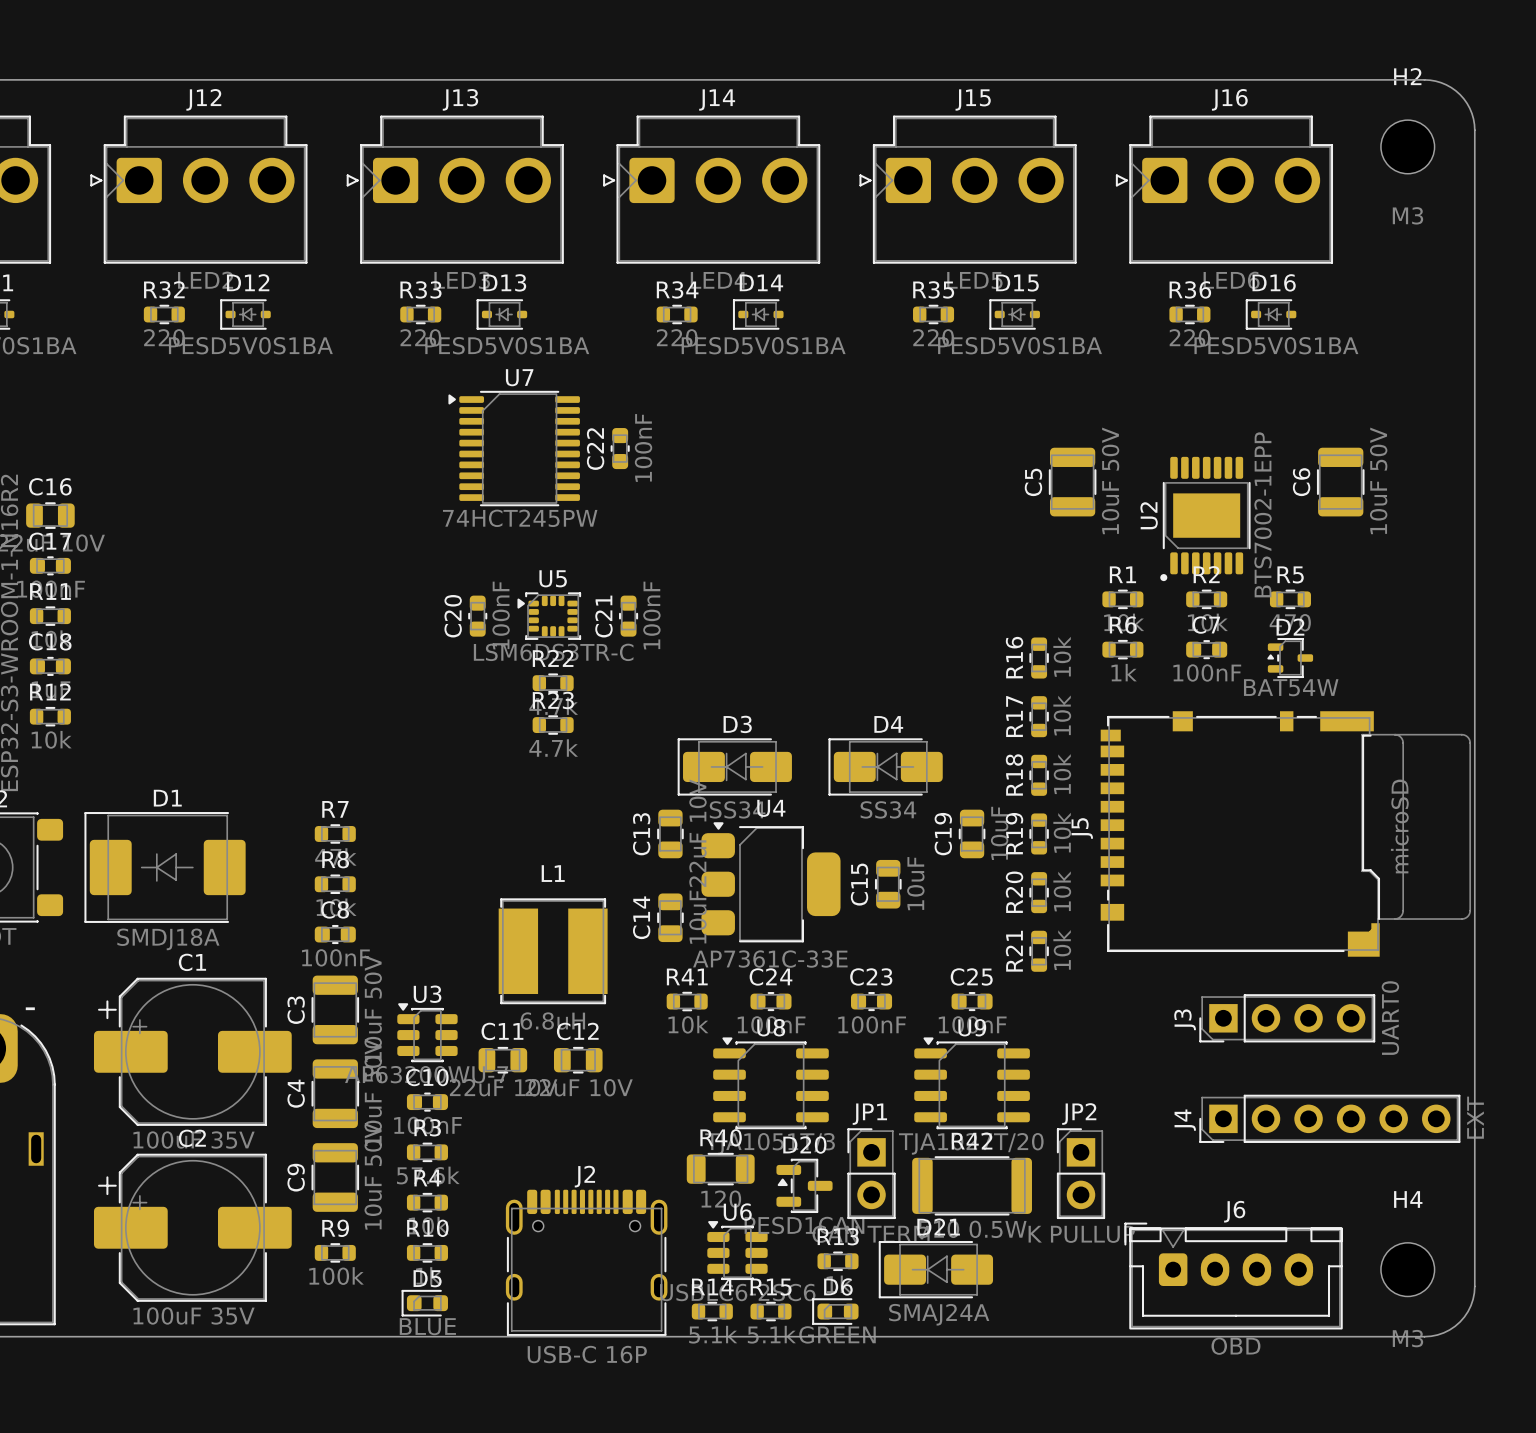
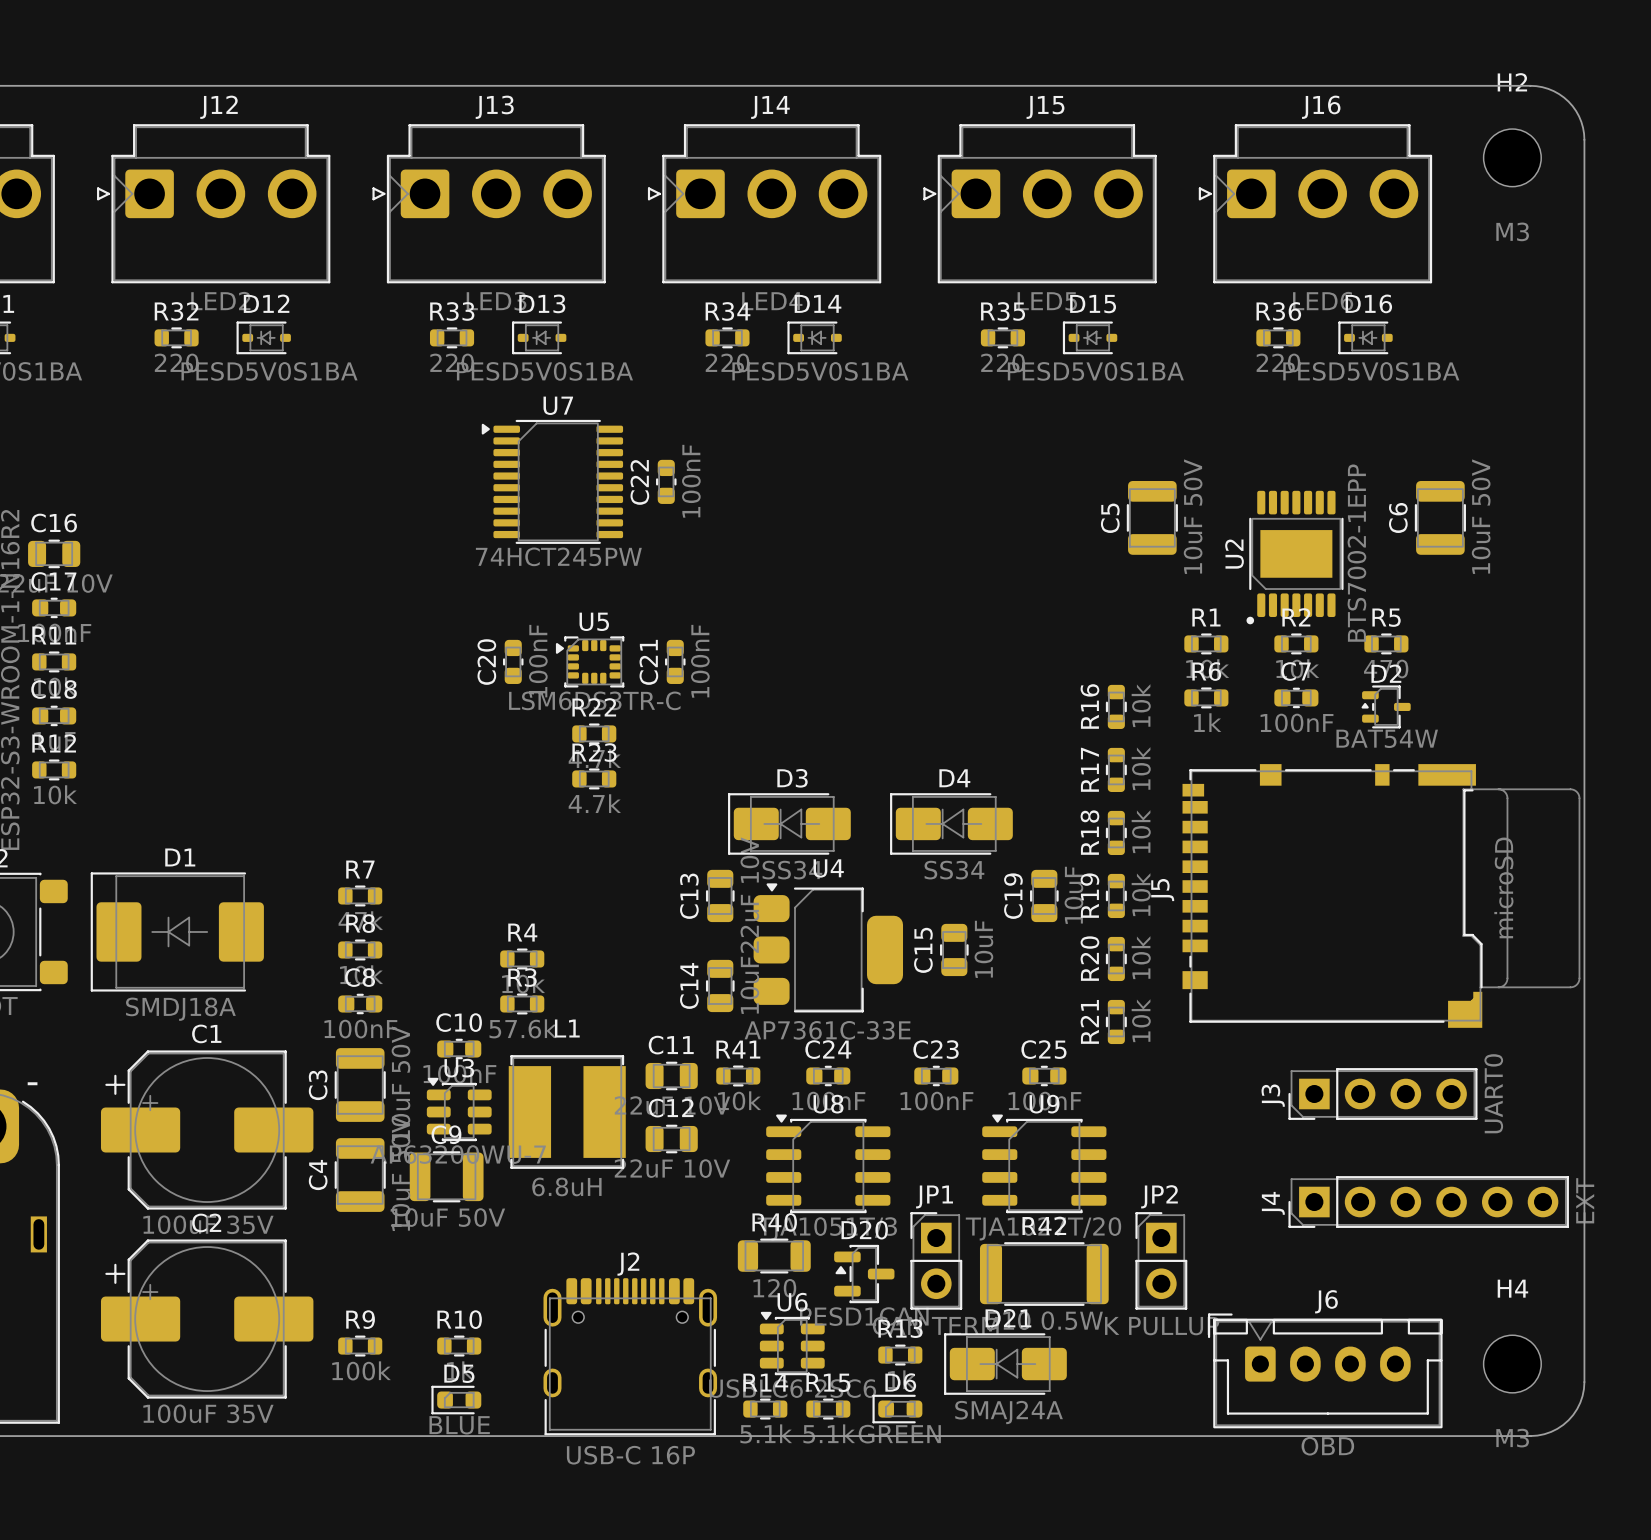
L1 position: (553, 951) -> (567, 1112)
C11 position: (502, 1060) -> (671, 1075)
C12 position: (578, 1060) -> (671, 1139)
C10 position: (427, 1102) -> (459, 1048)
R3 position: (427, 1152) -> (522, 1003)
C9 rotation: 0° (335, 1177) -> 90° clockwise (446, 1176)
C9 position: (335, 1177) -> (446, 1176)
R4 position: (427, 1202) -> (522, 958)

